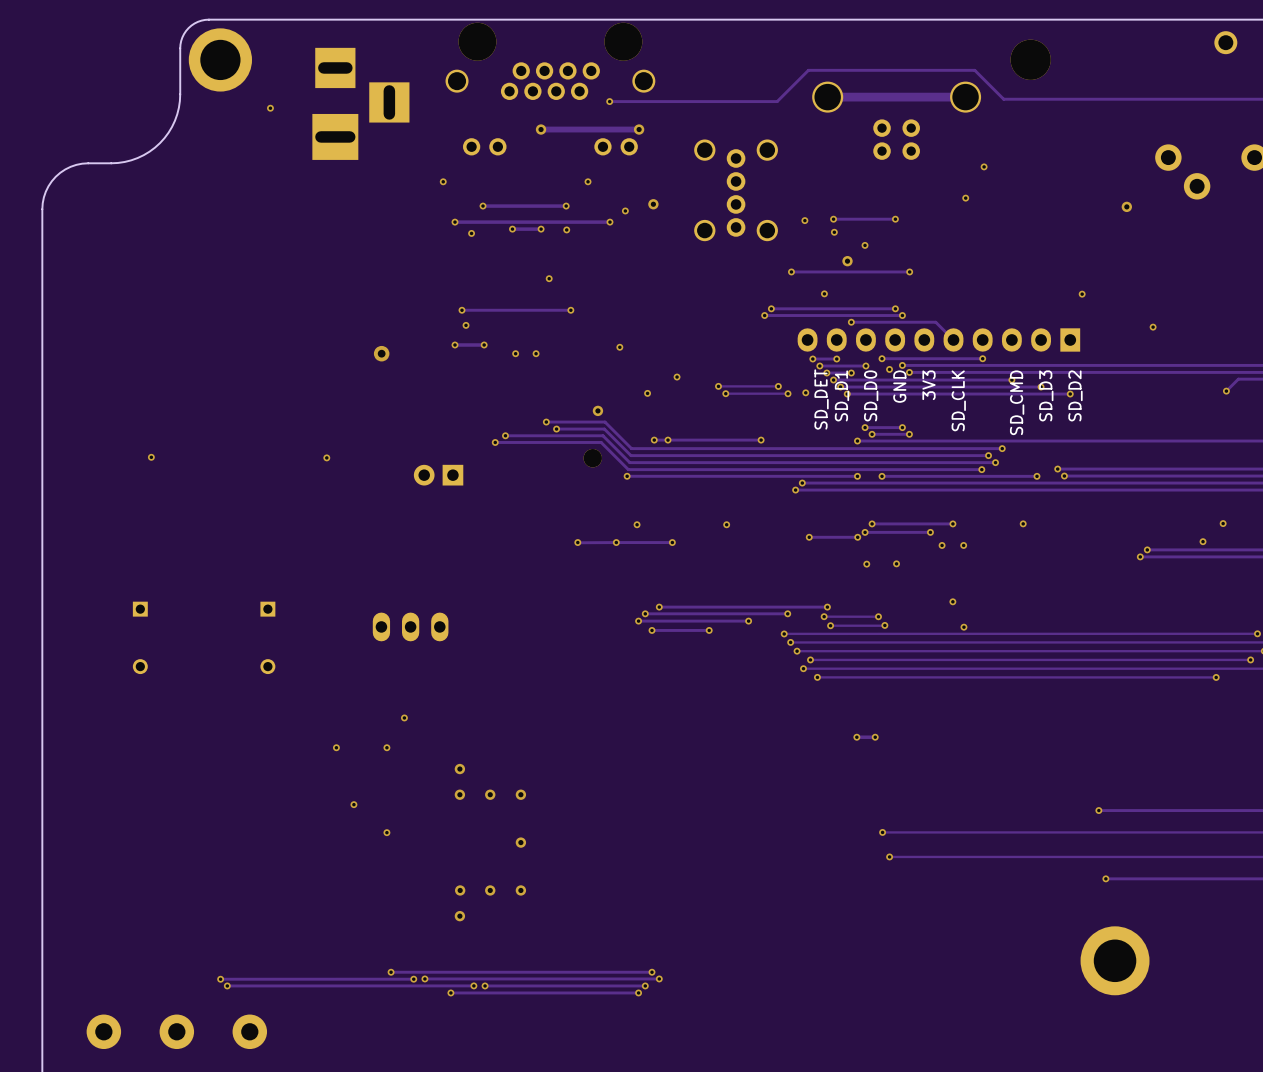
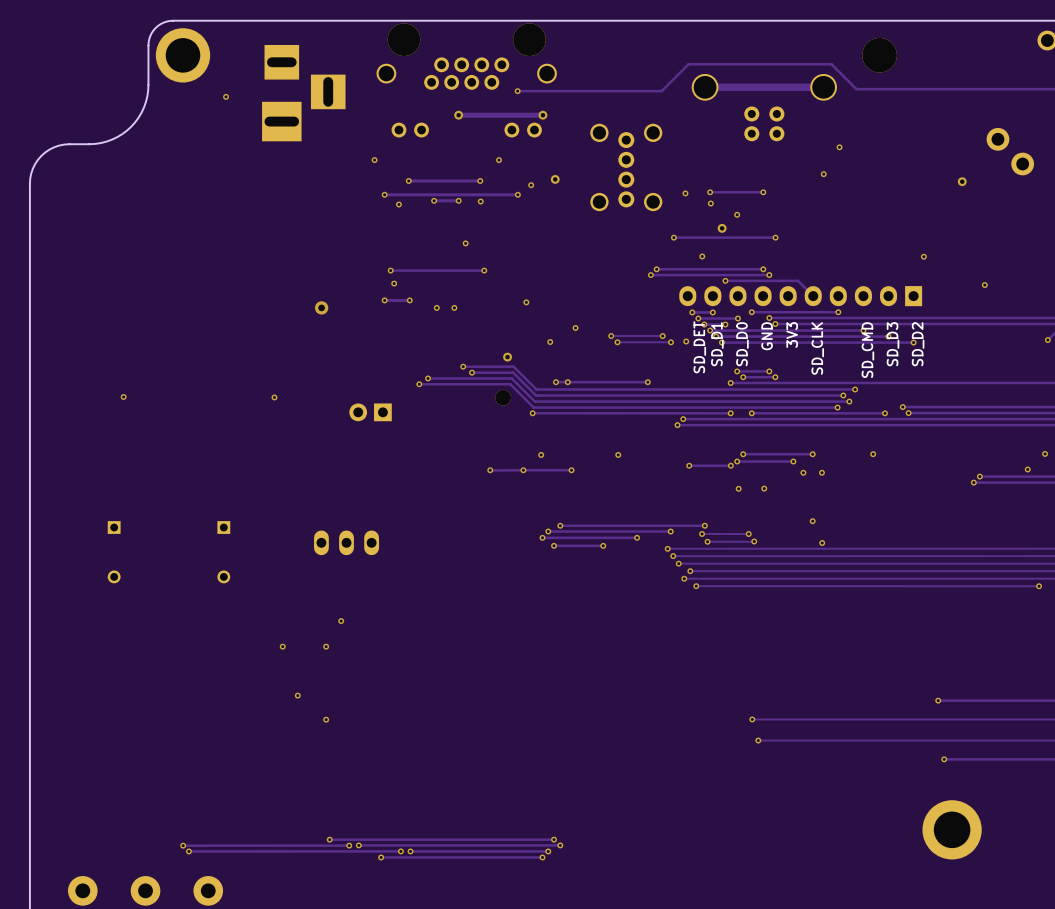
via: (889, 369) -> none
via: (856, 737) -> none
track: (875, 737) (856, 737) -> none
via: (875, 737) -> none
via: (459, 769) -> none
via: (459, 794) -> none
via: (490, 794) -> none
via: (520, 794) -> none
via: (520, 842) -> none
via: (460, 890) -> none
via: (490, 890) -> none
via: (520, 890) -> none
via: (459, 916) -> none

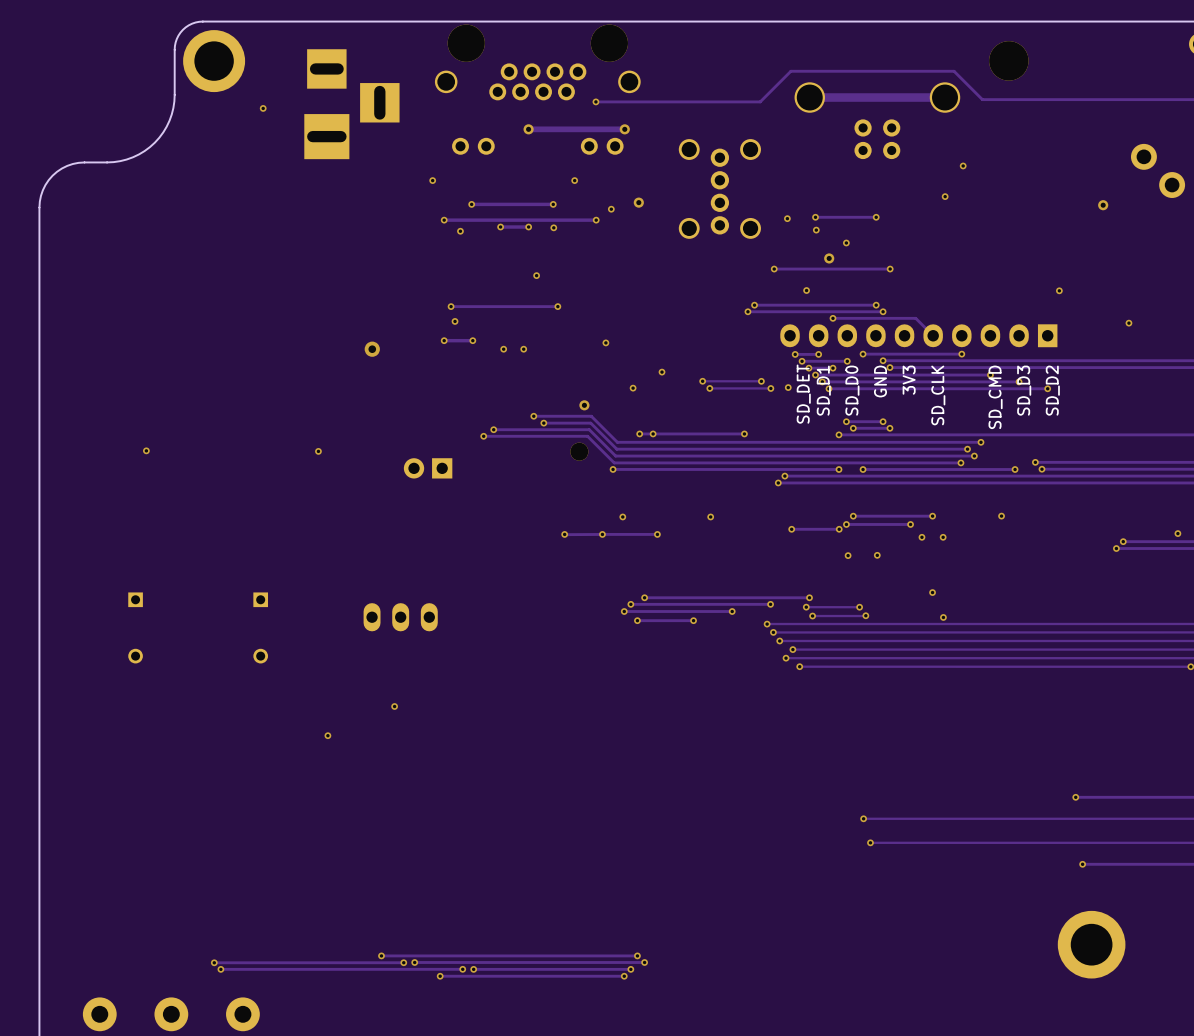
via: (326, 646) -> none
via: (297, 695) -> none
via: (326, 719) -> none

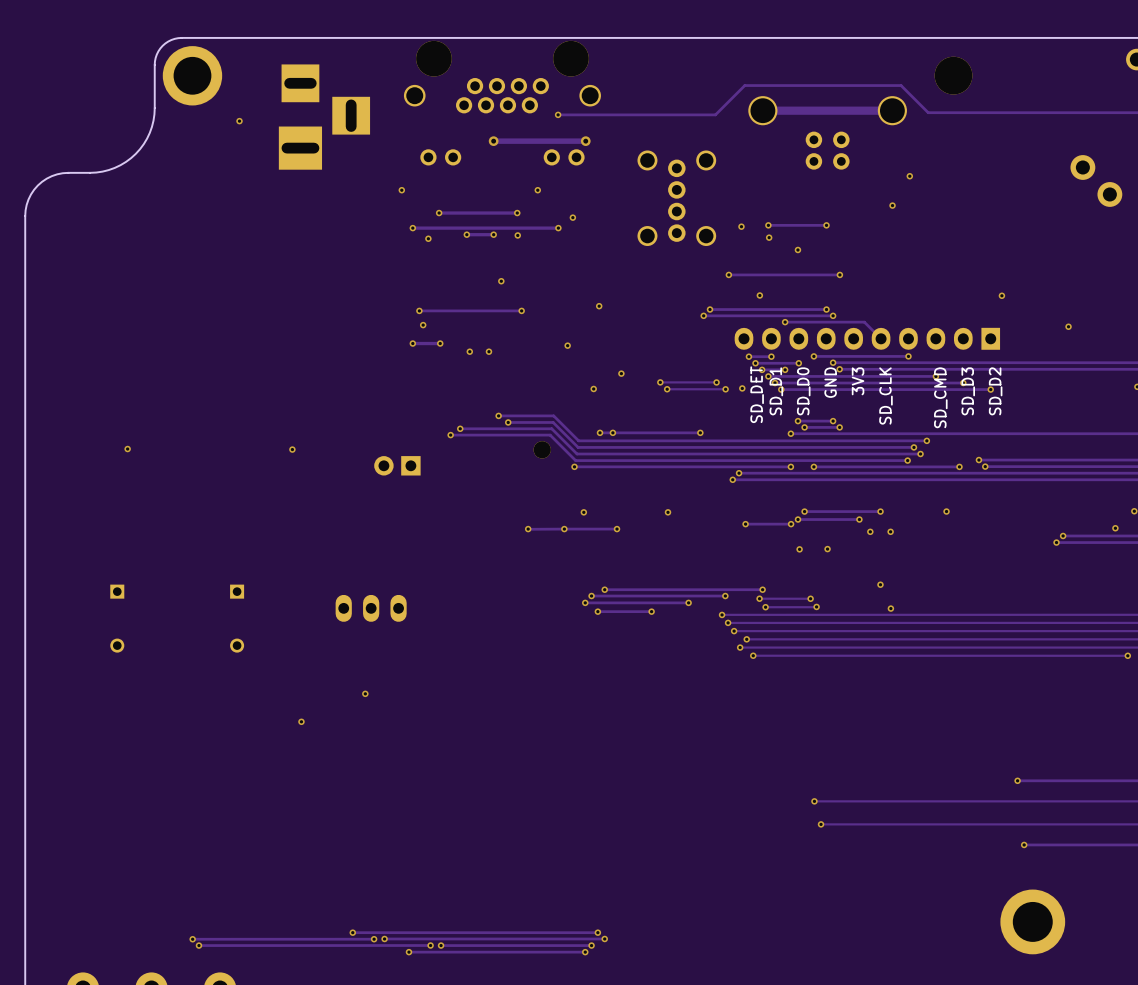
via: (638, 202) -> none
via: (1103, 205) -> none
via: (829, 258) -> none
via: none -> (599, 306)
via: (372, 349) -> none
via: (584, 405) -> none

